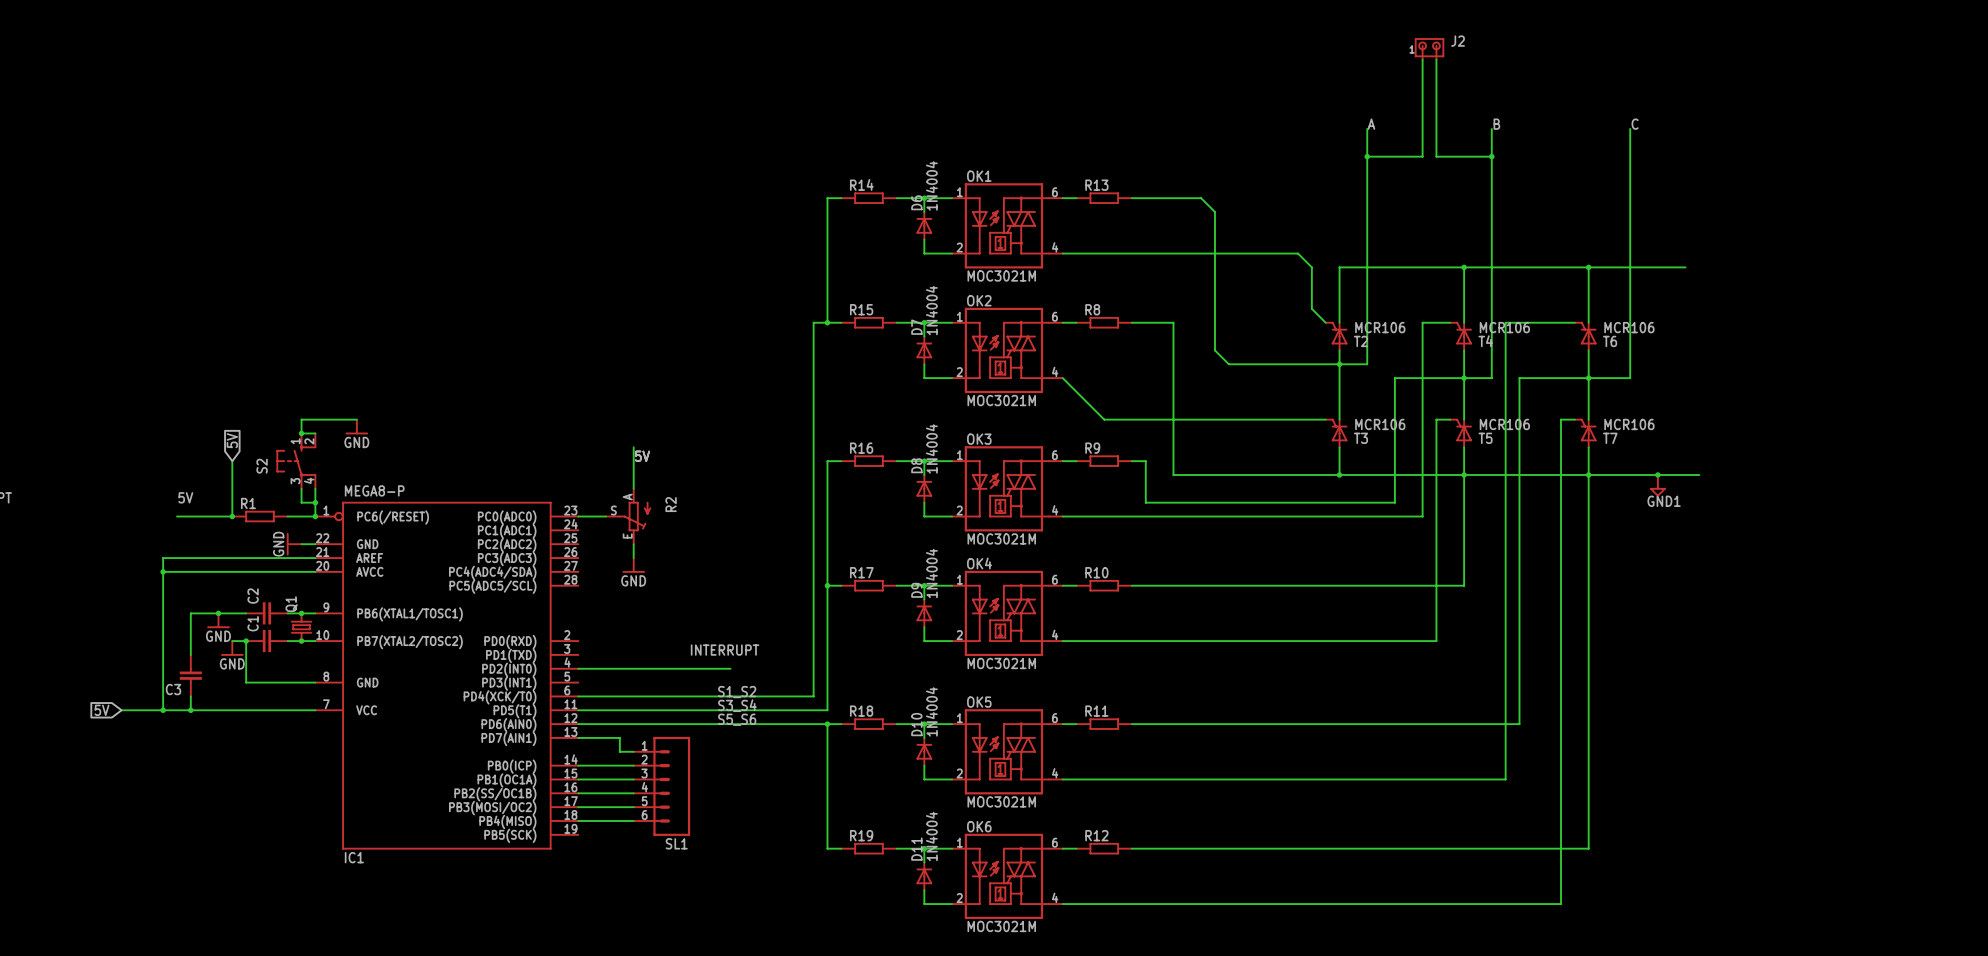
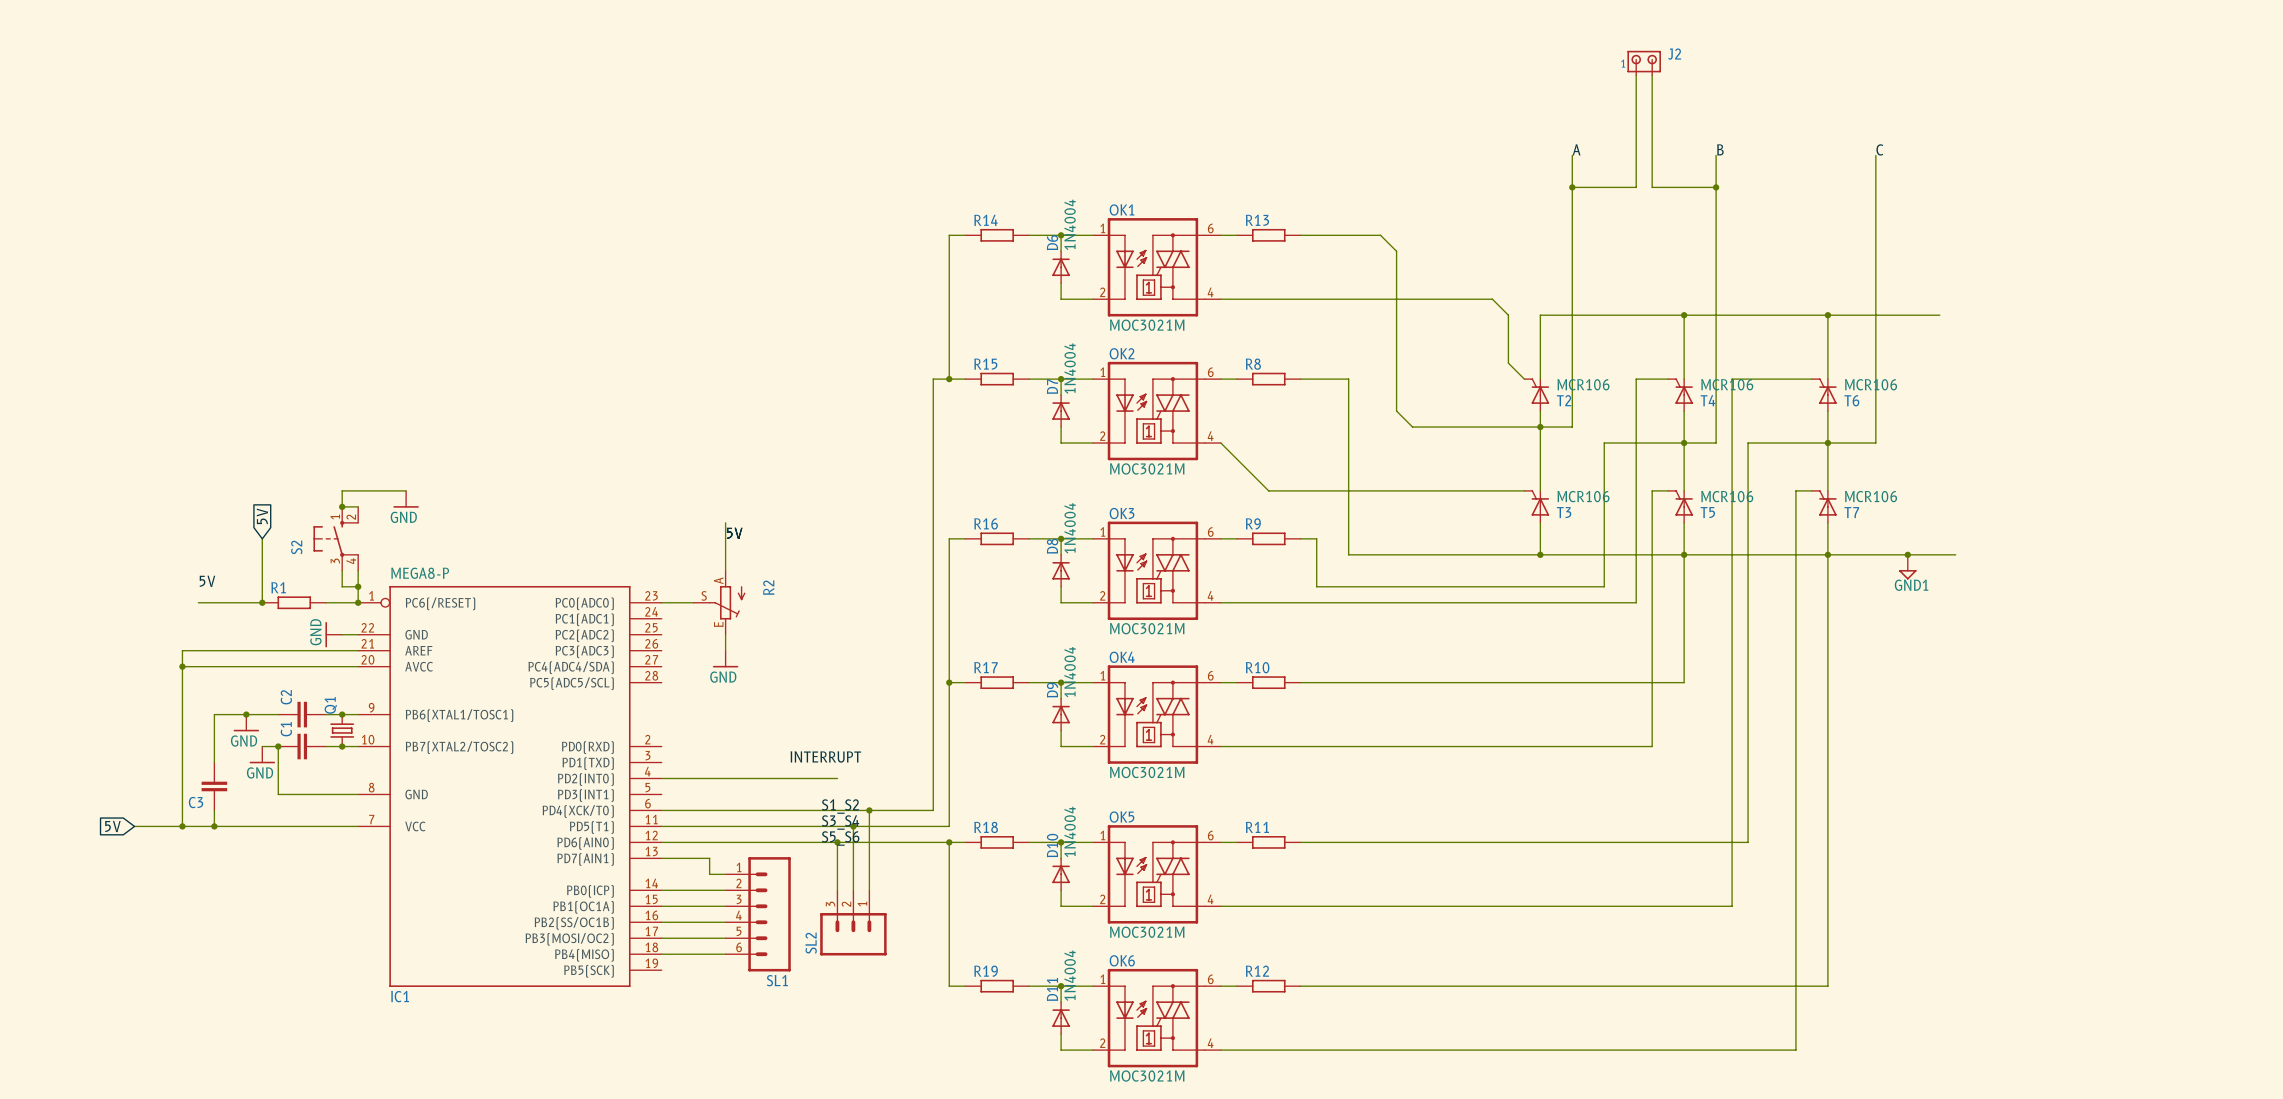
wire: none -> (869, 810) (869, 890)
junction: none -> (869, 810)
wire: none -> (853, 826) (853, 890)
junction: none -> (853, 826)
wire: none -> (837, 842) (837, 890)
junction: none -> (837, 842)
SL2: none -> (853, 922)

